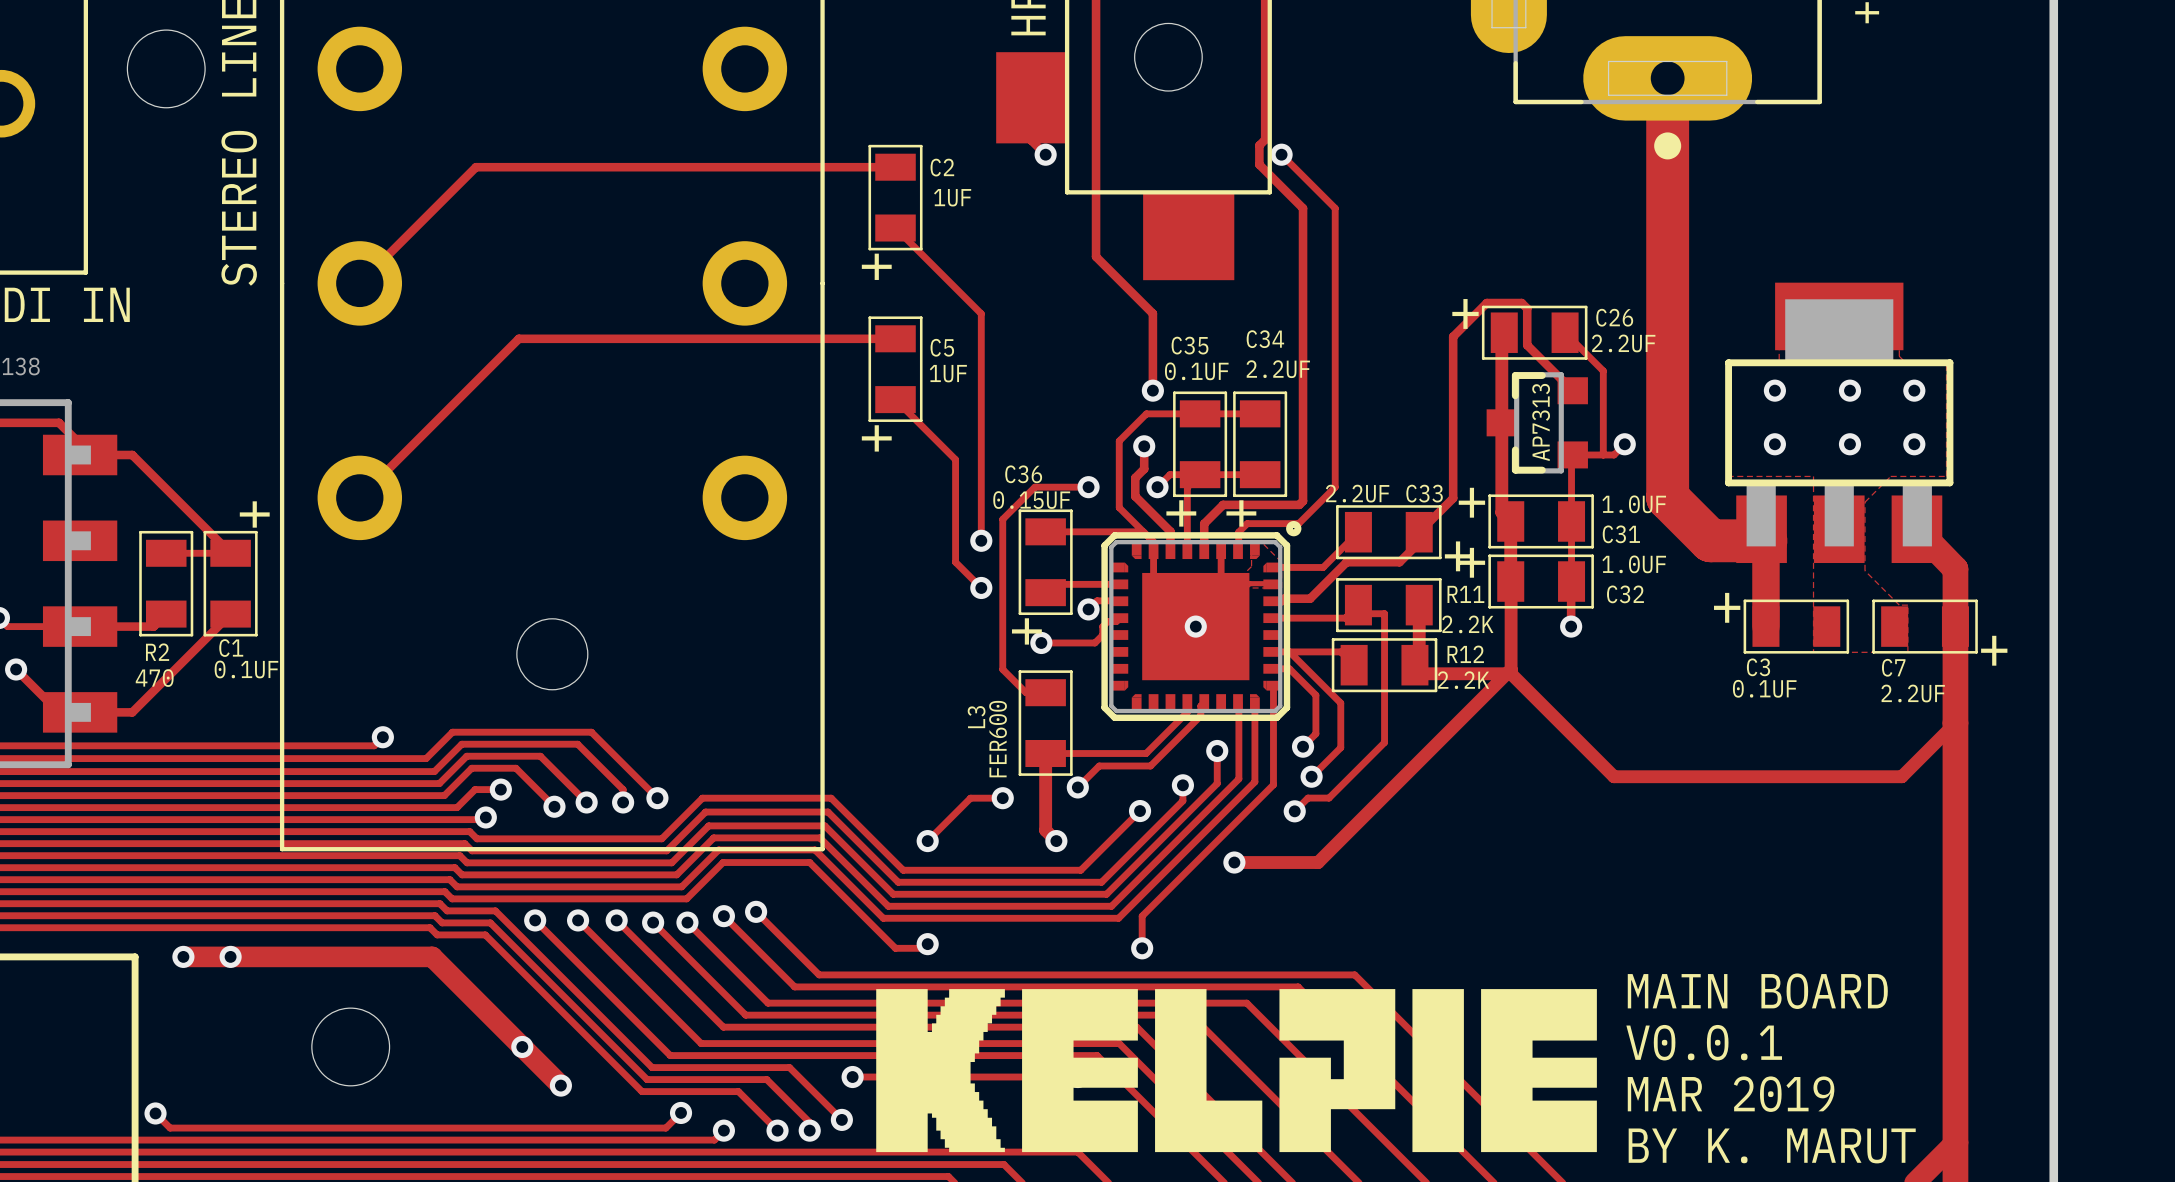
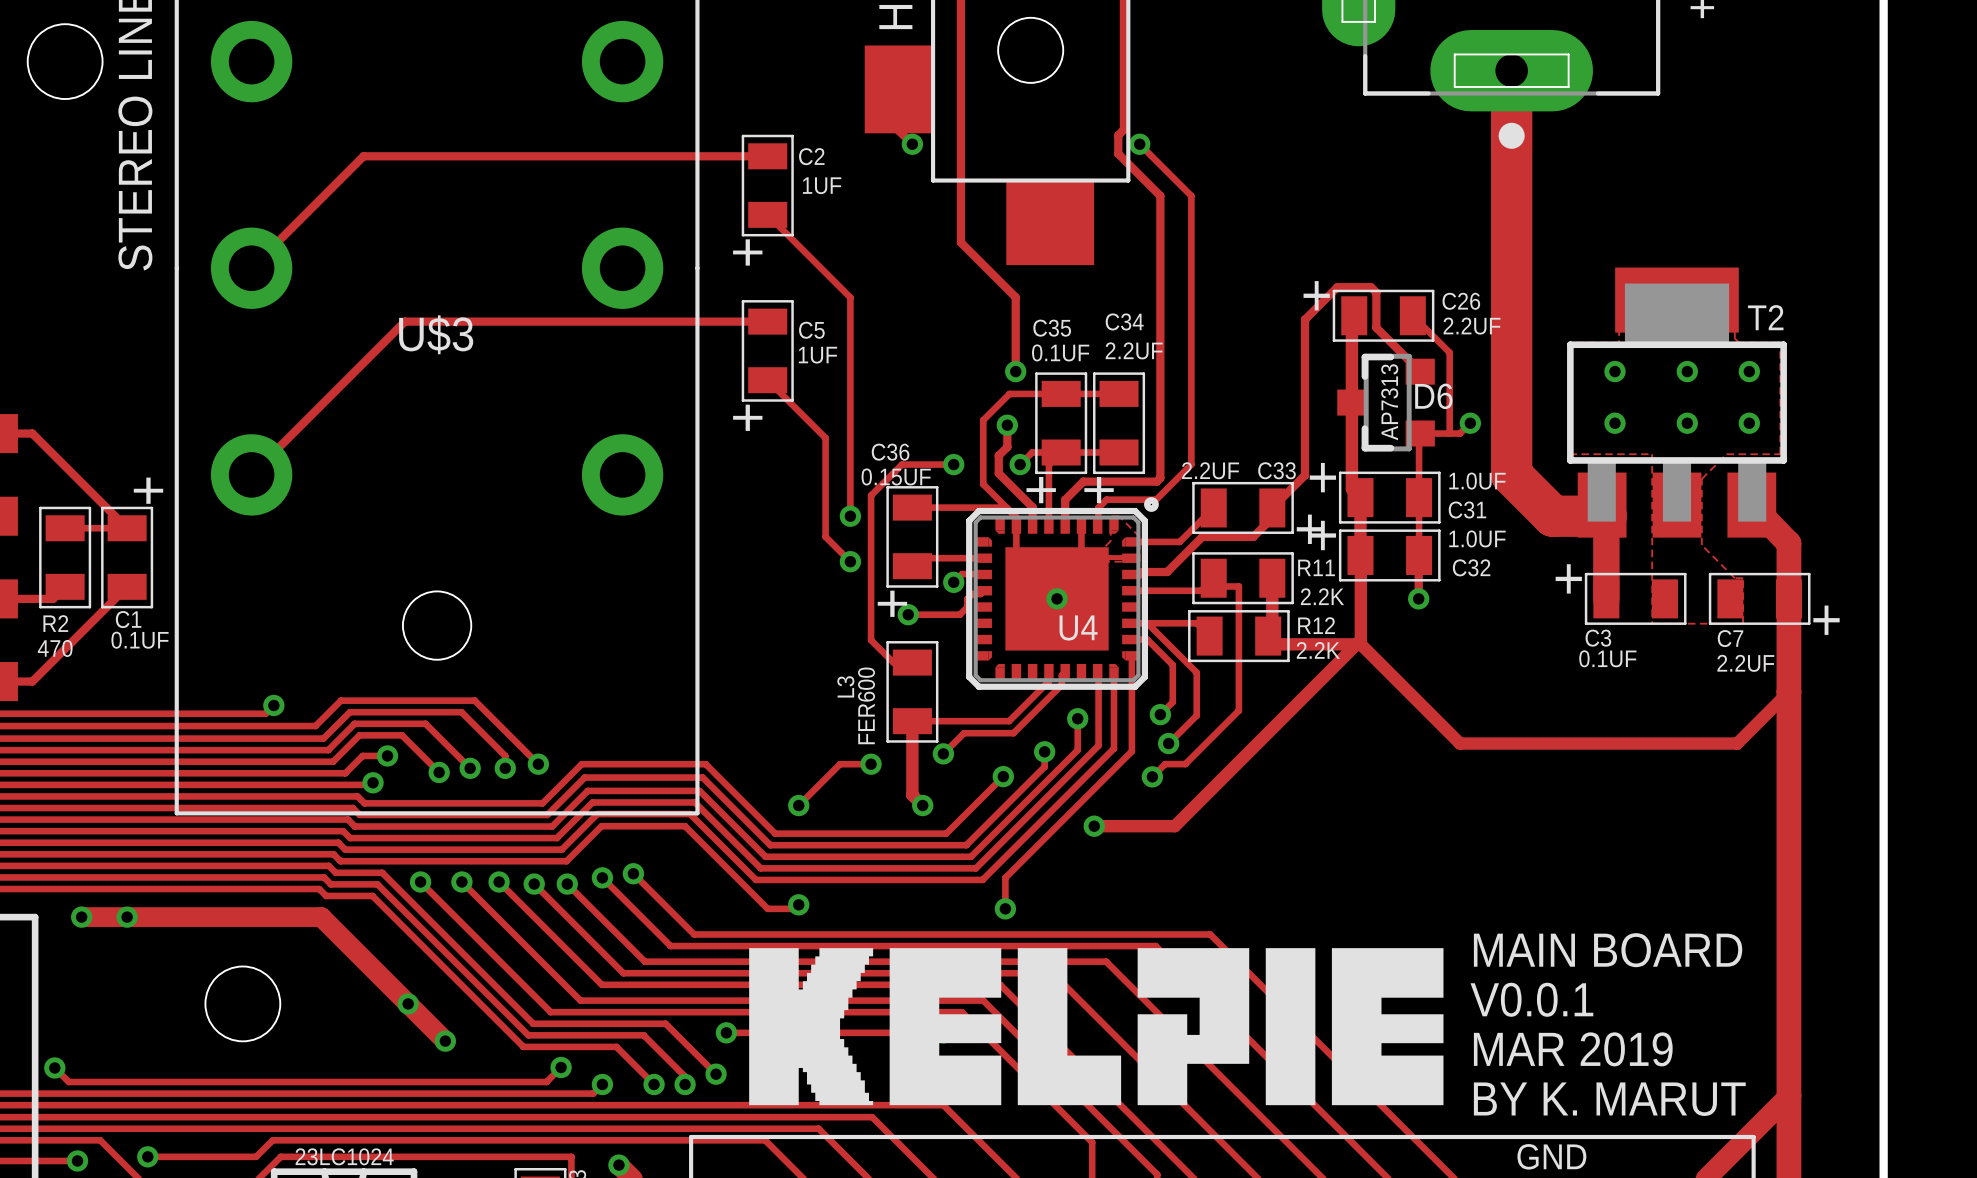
text: none -> T2 (1765, 317)
text: none -> U$3 (436, 334)
text: none -> D6 (1433, 396)
text: none -> U4 (1078, 627)

